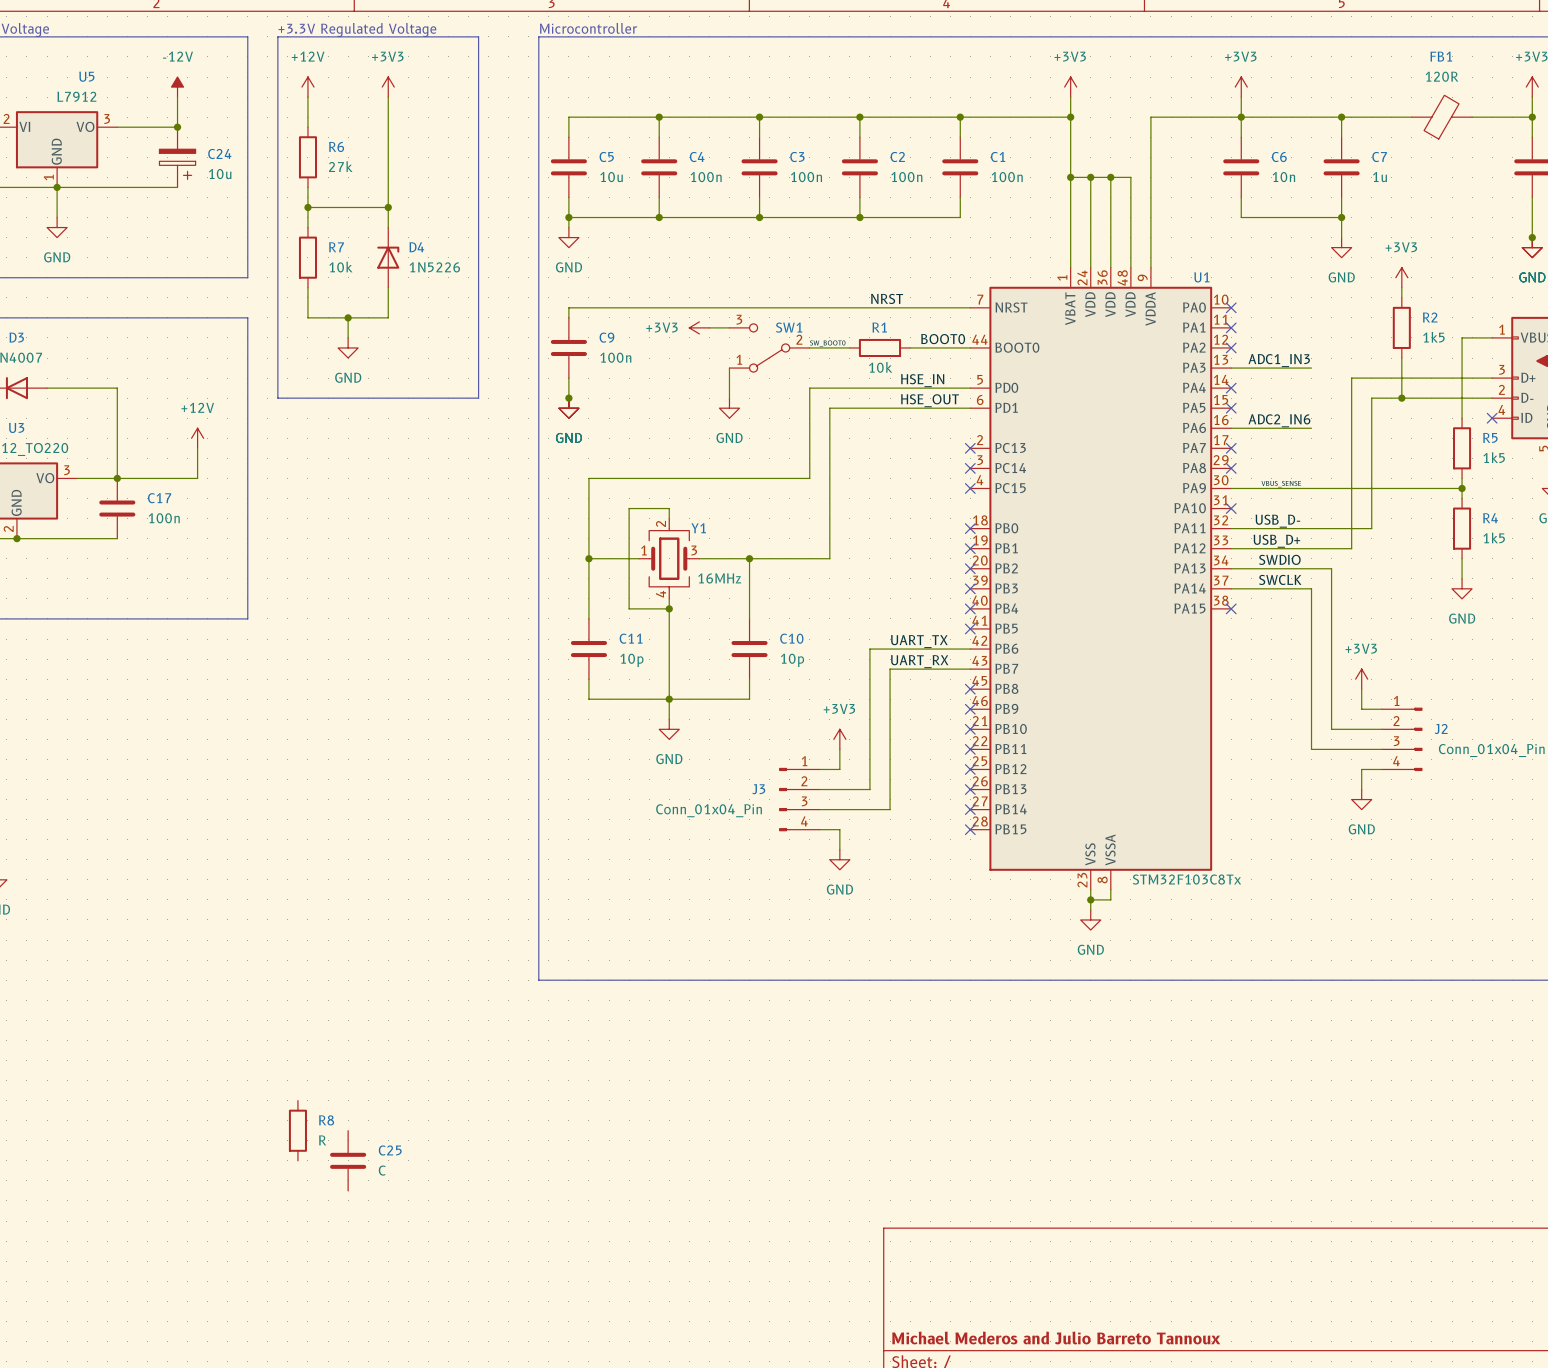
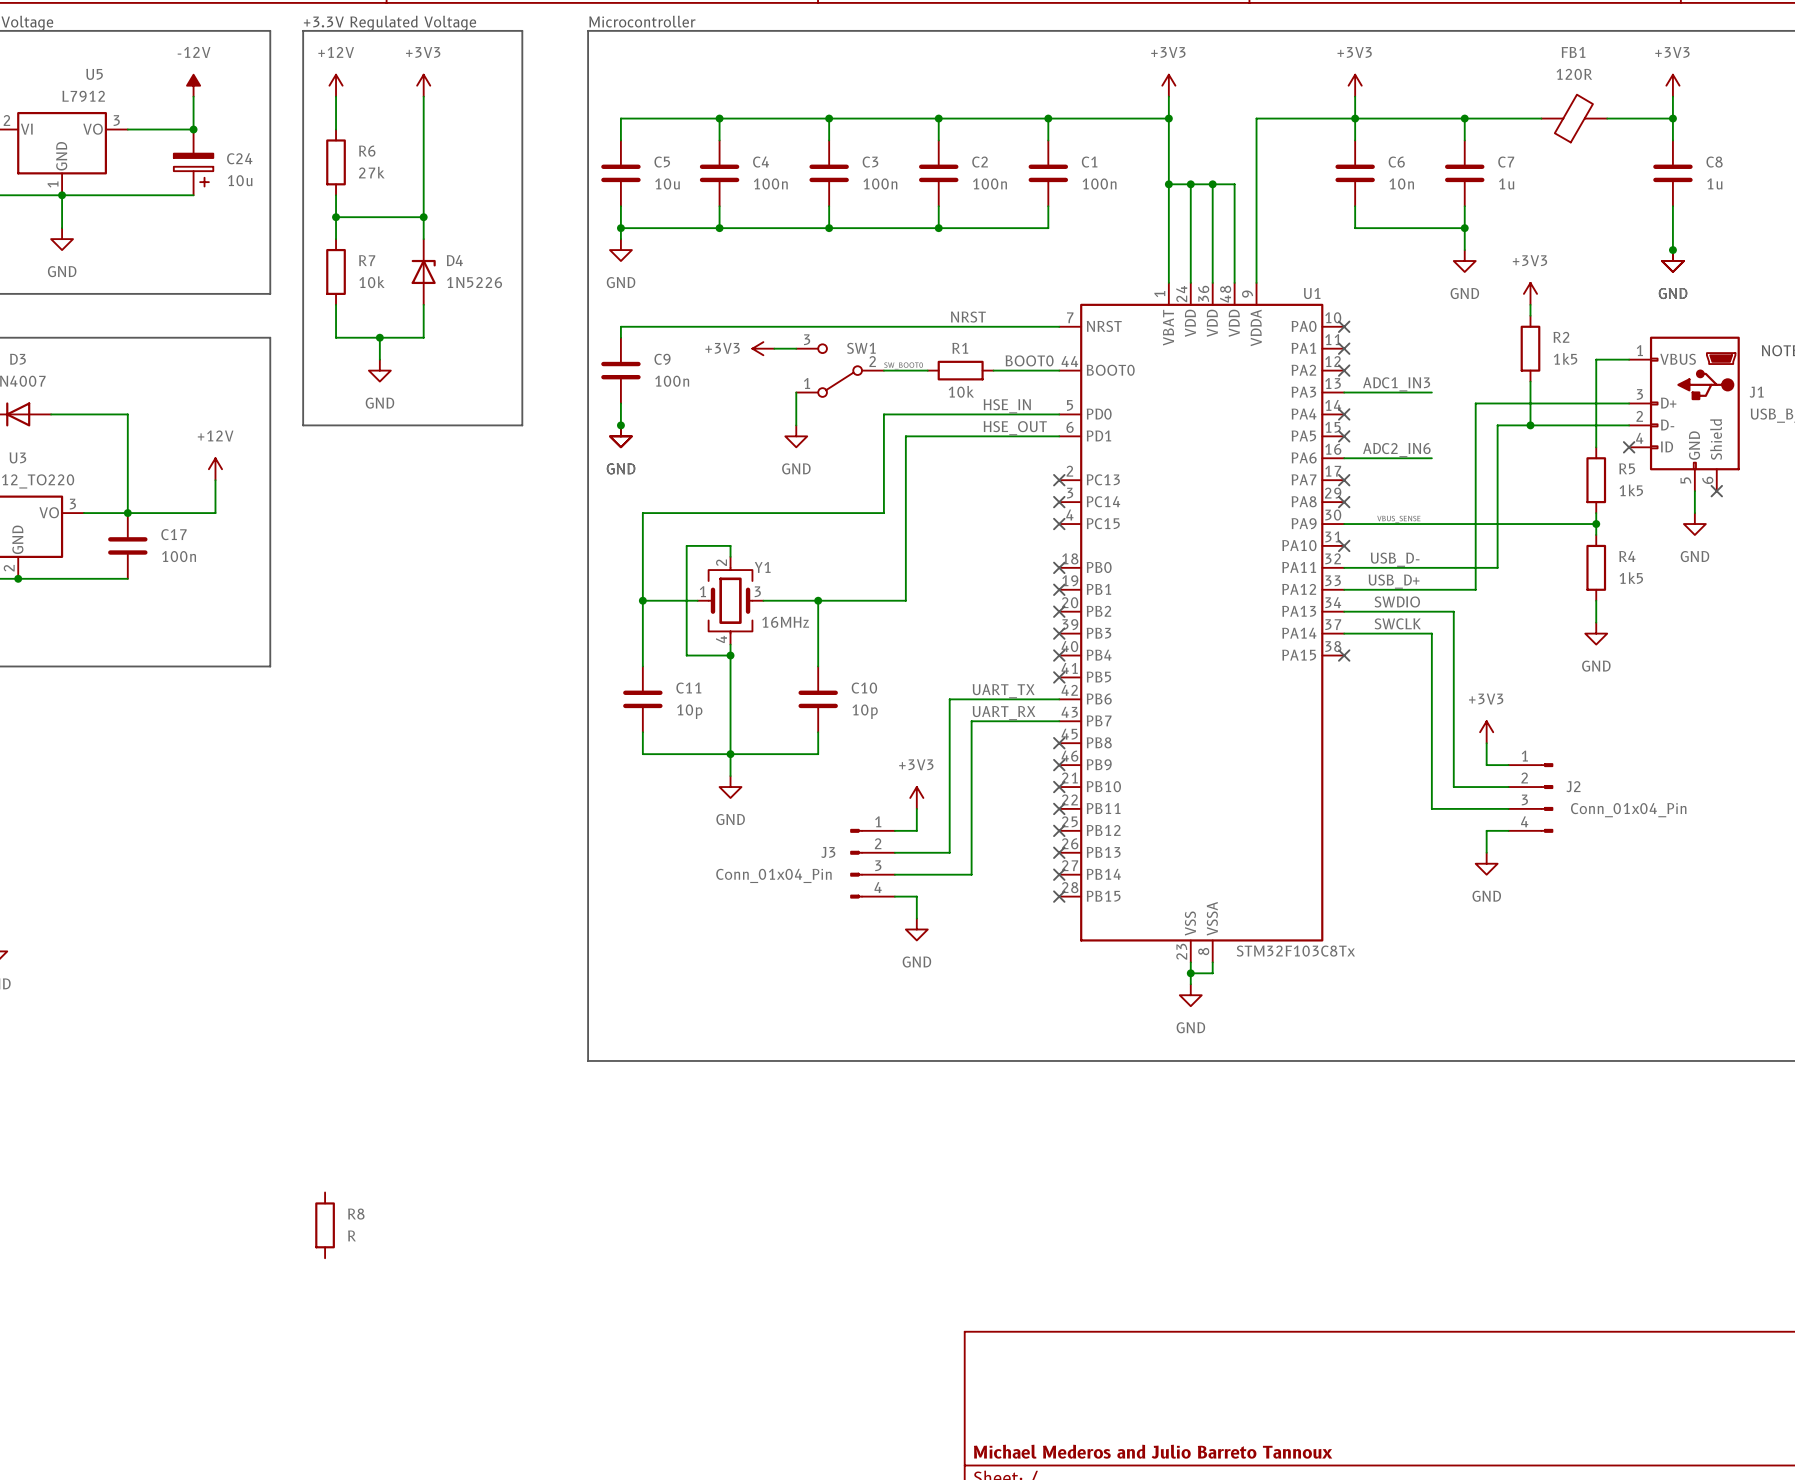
C25: C (348, 1160) -> none

